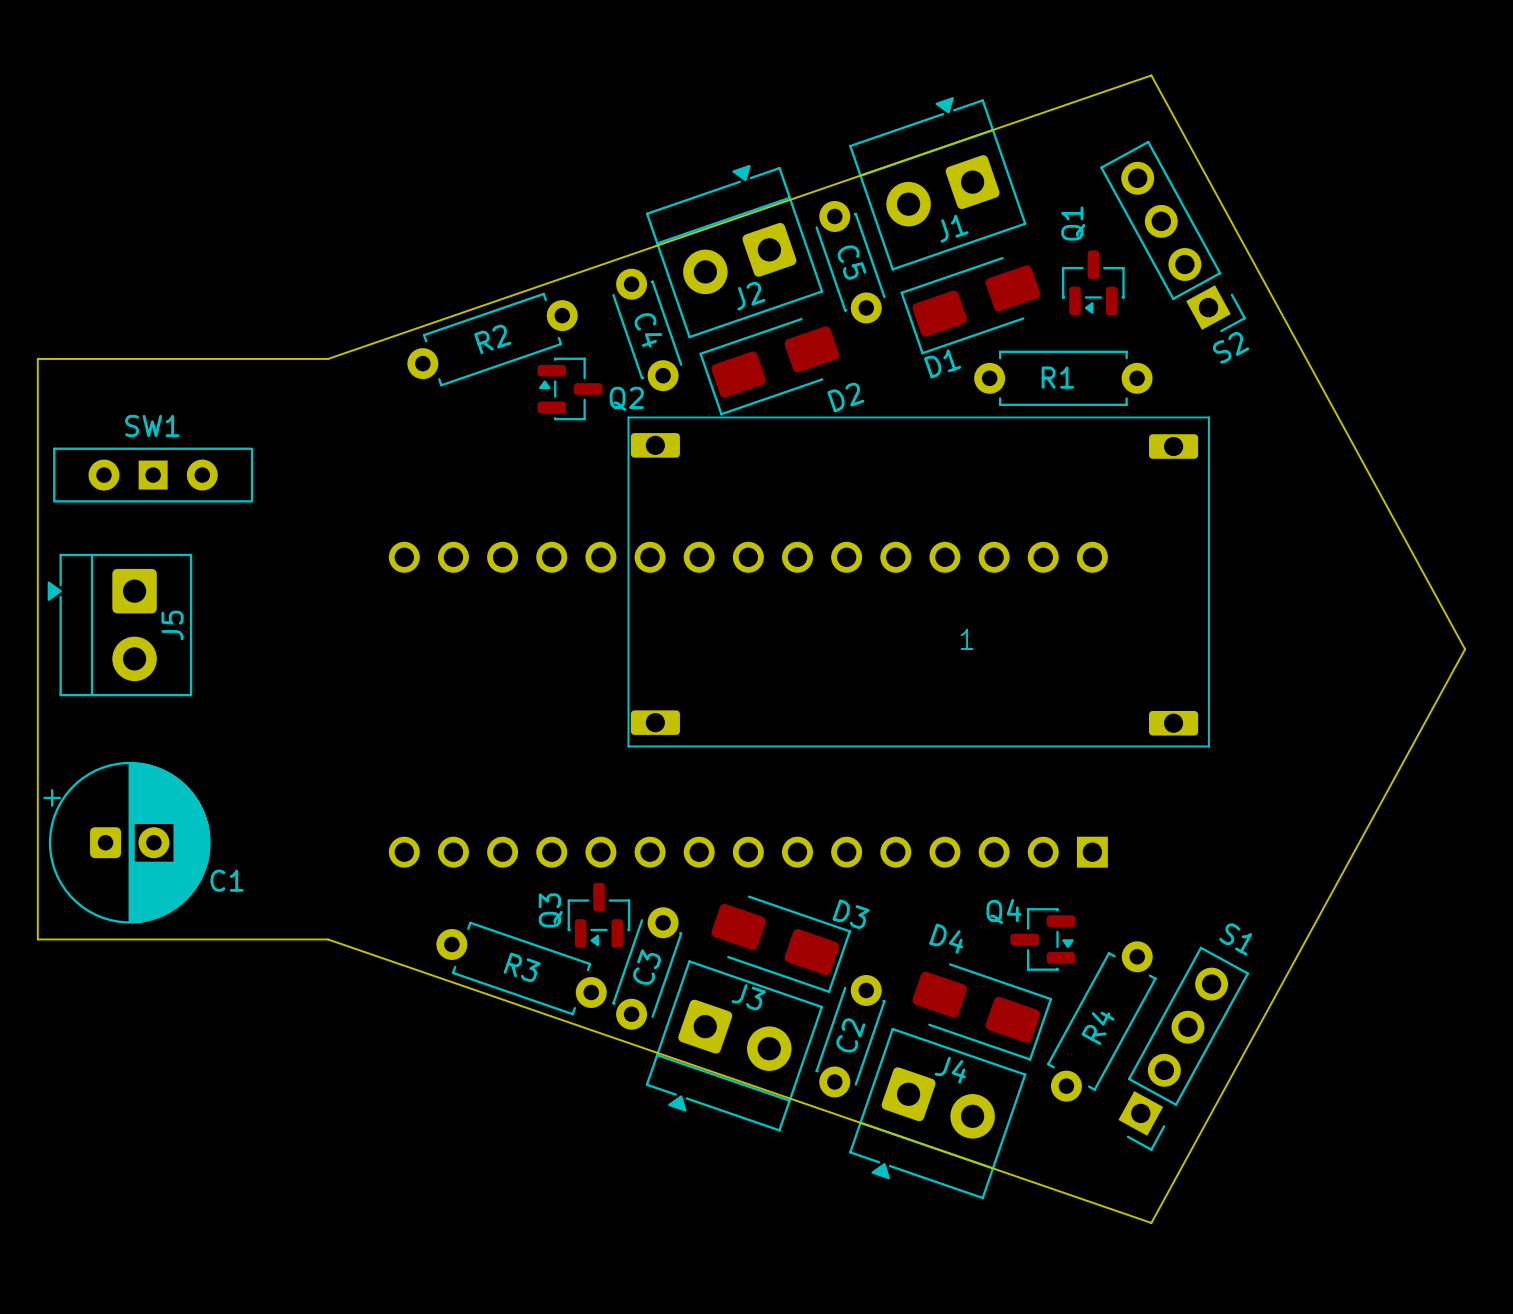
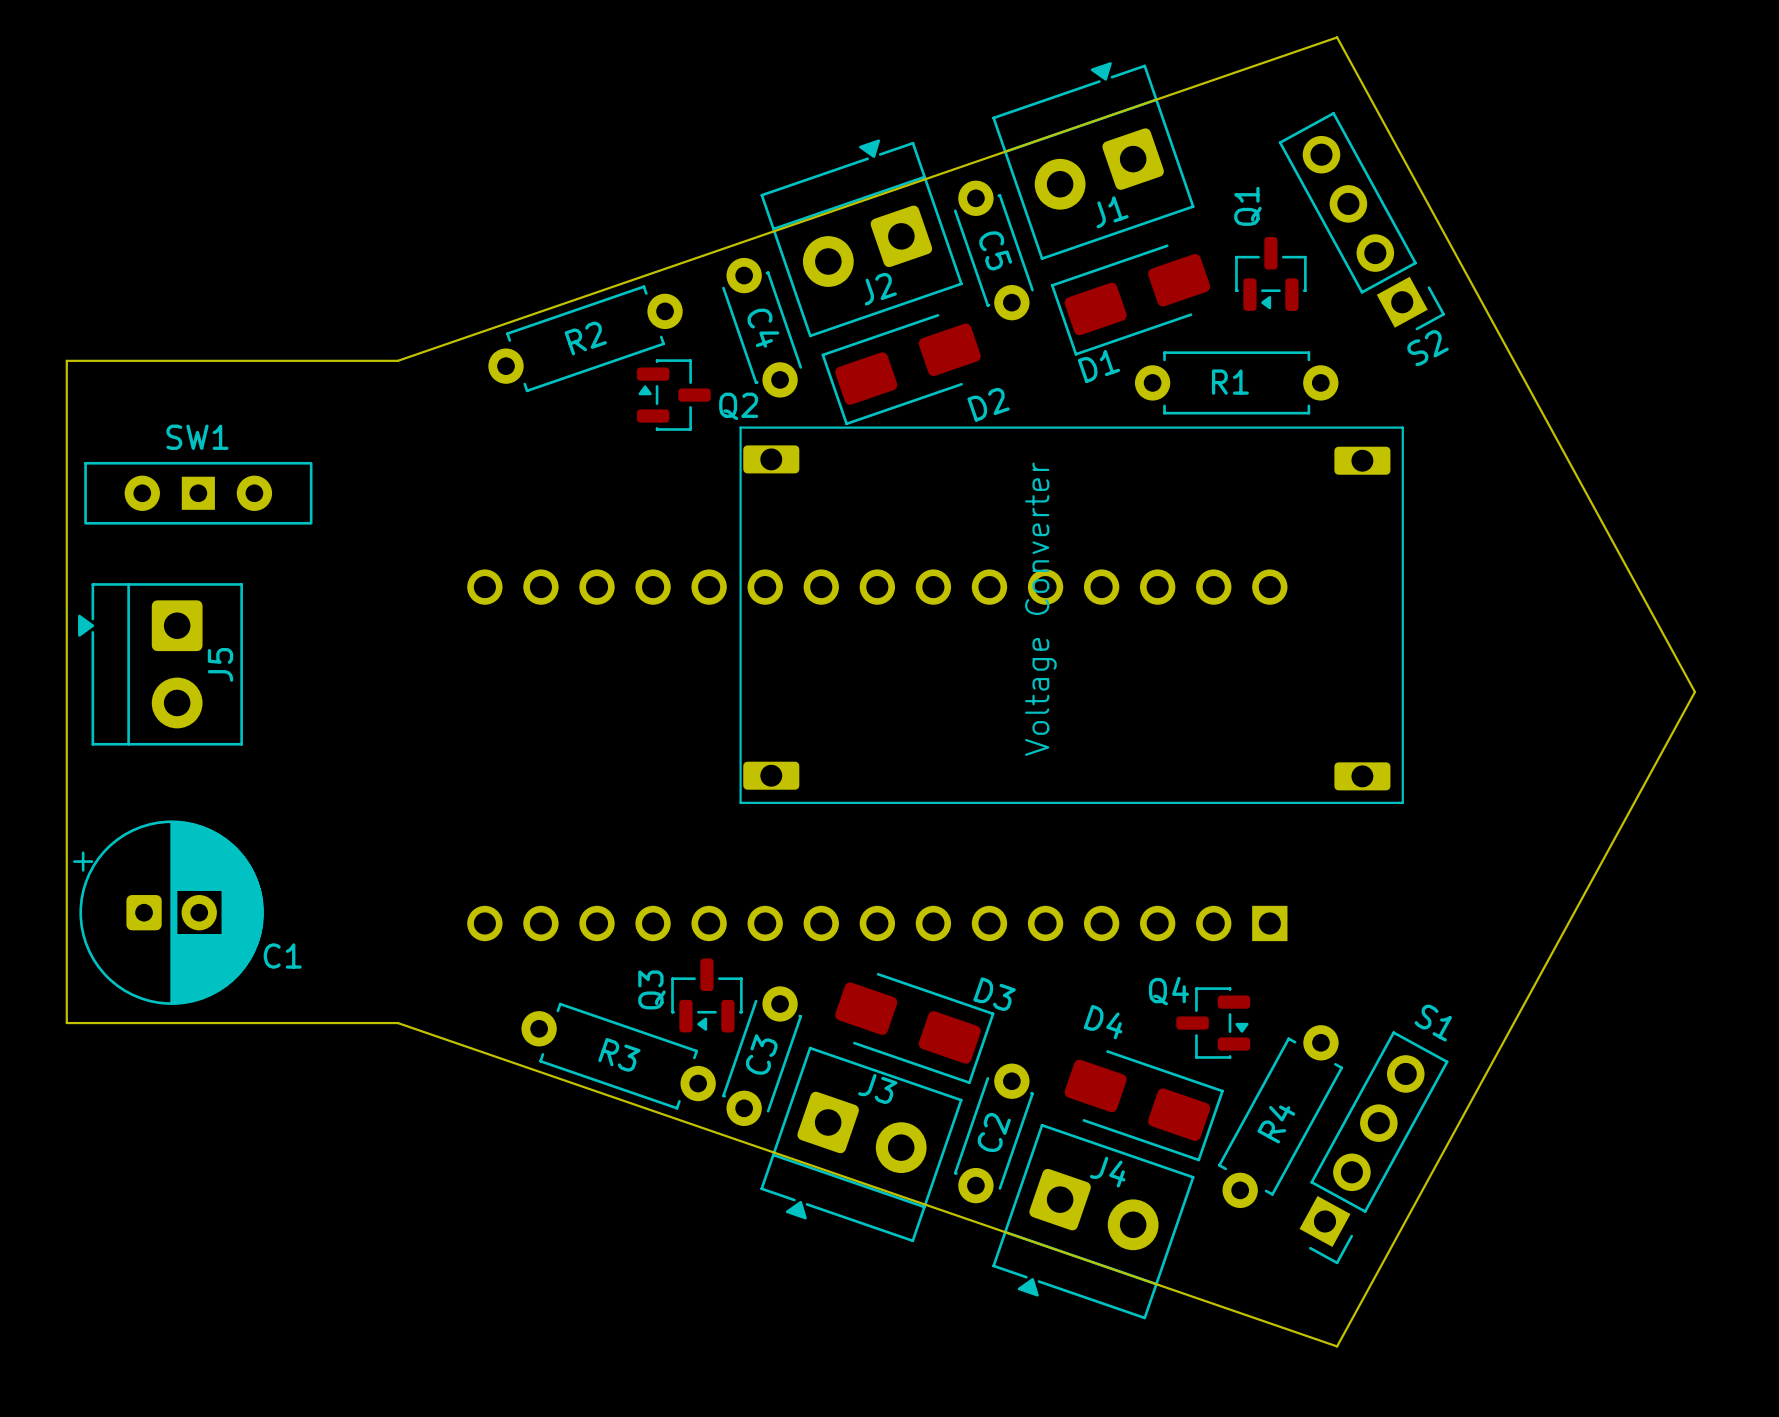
1 name: 1 (967, 639) -> Voltage Converter (1040, 609)

